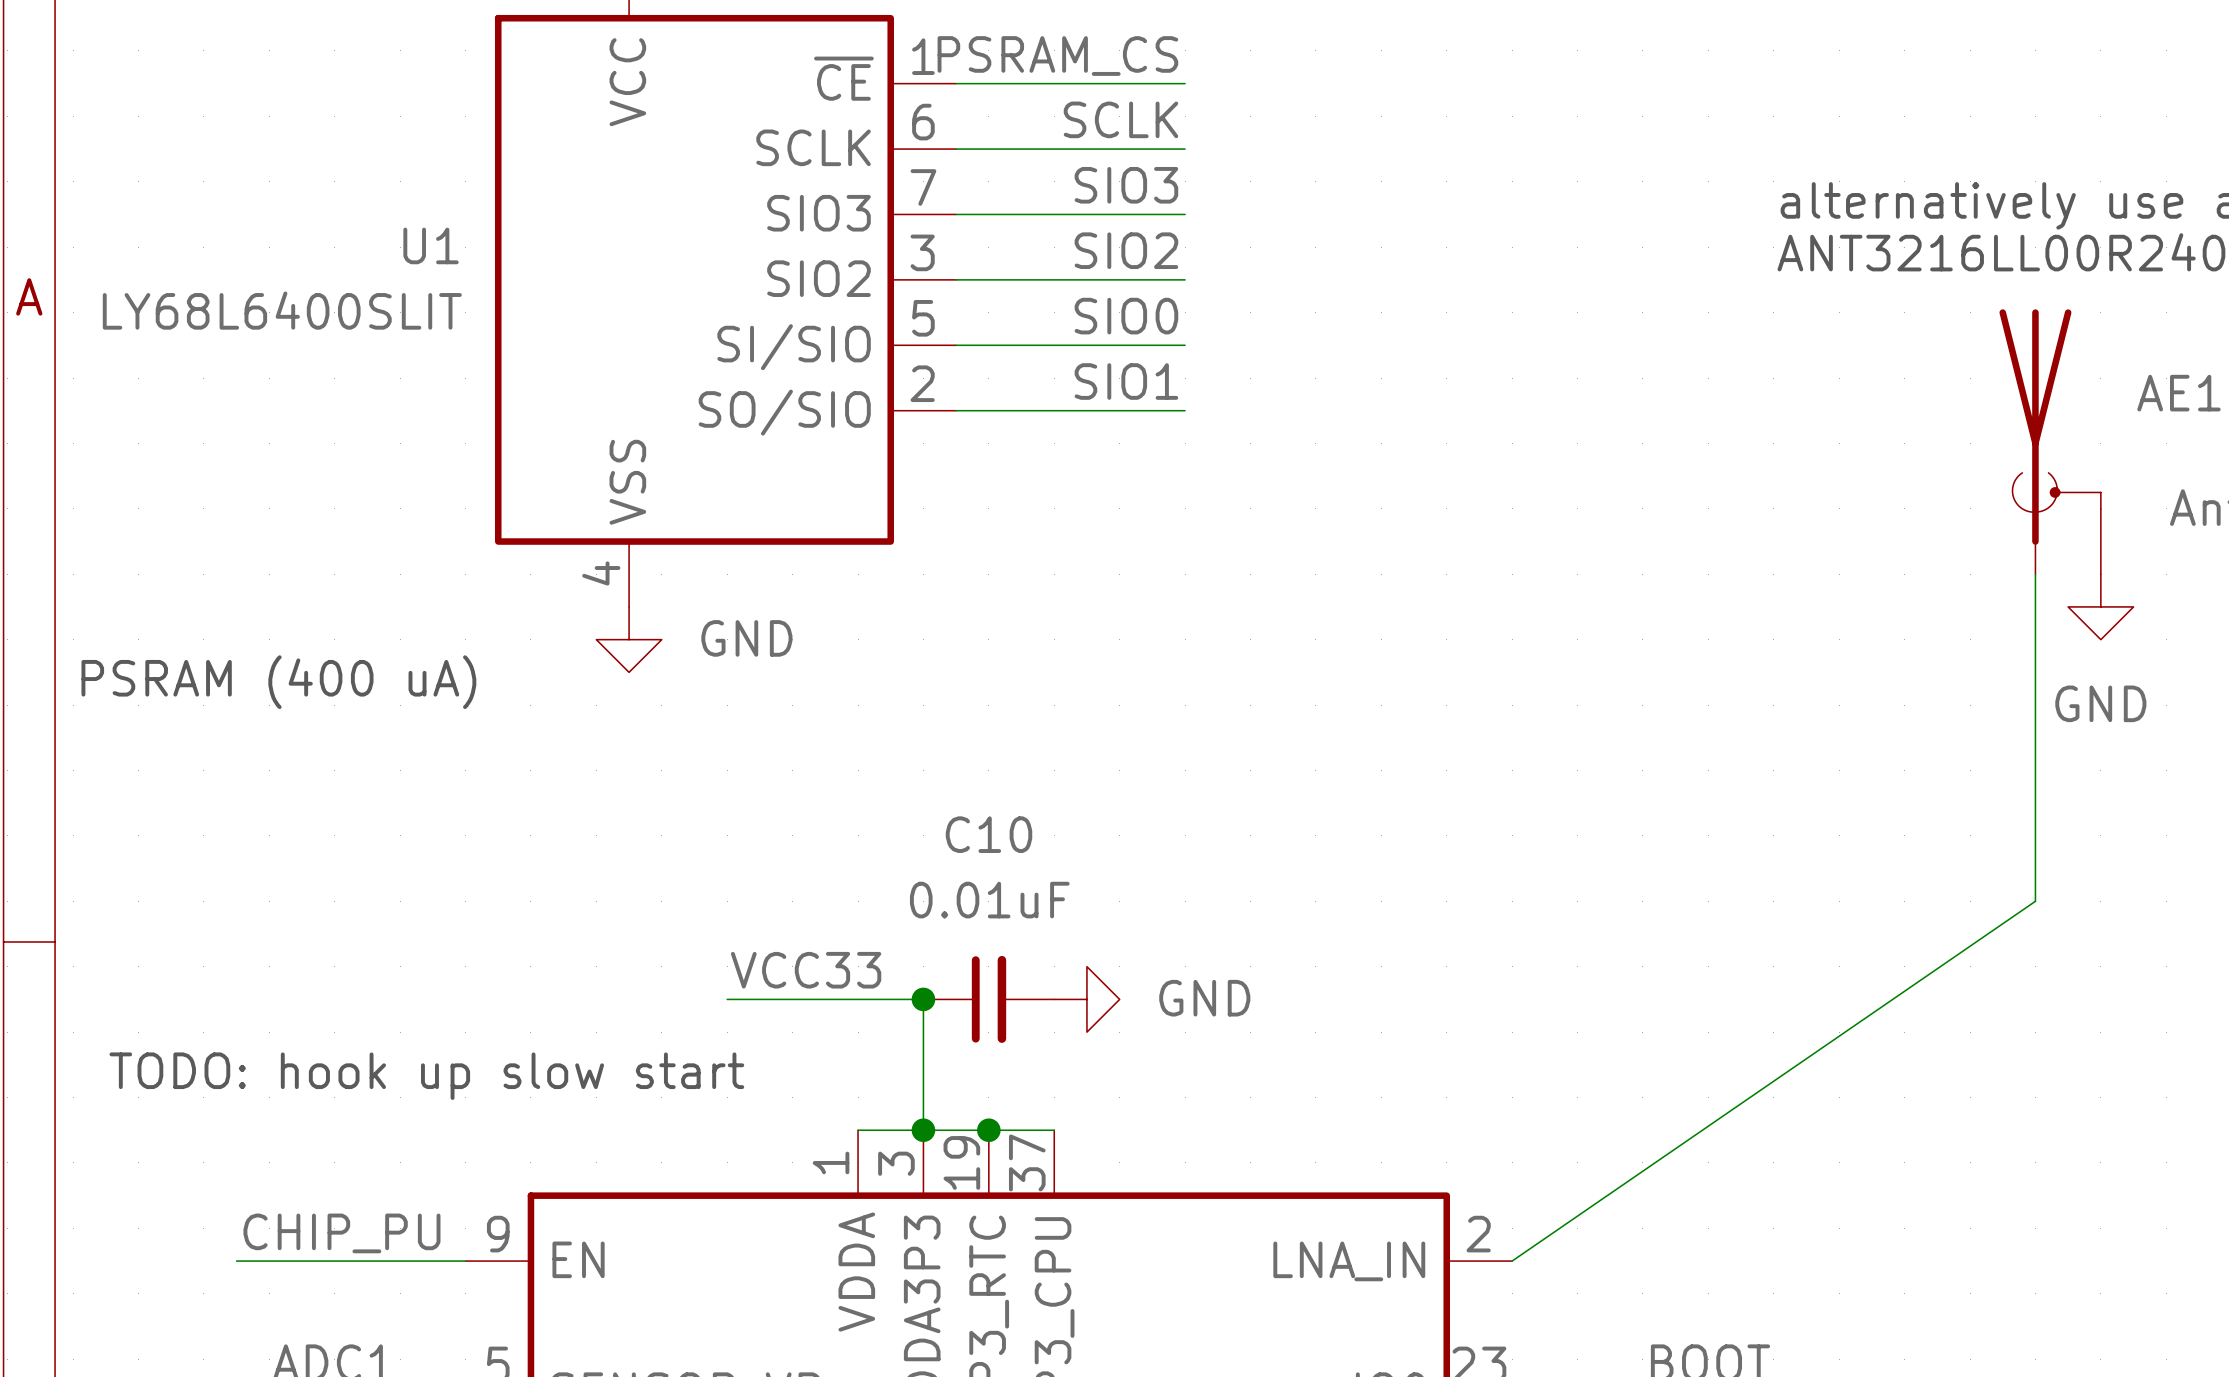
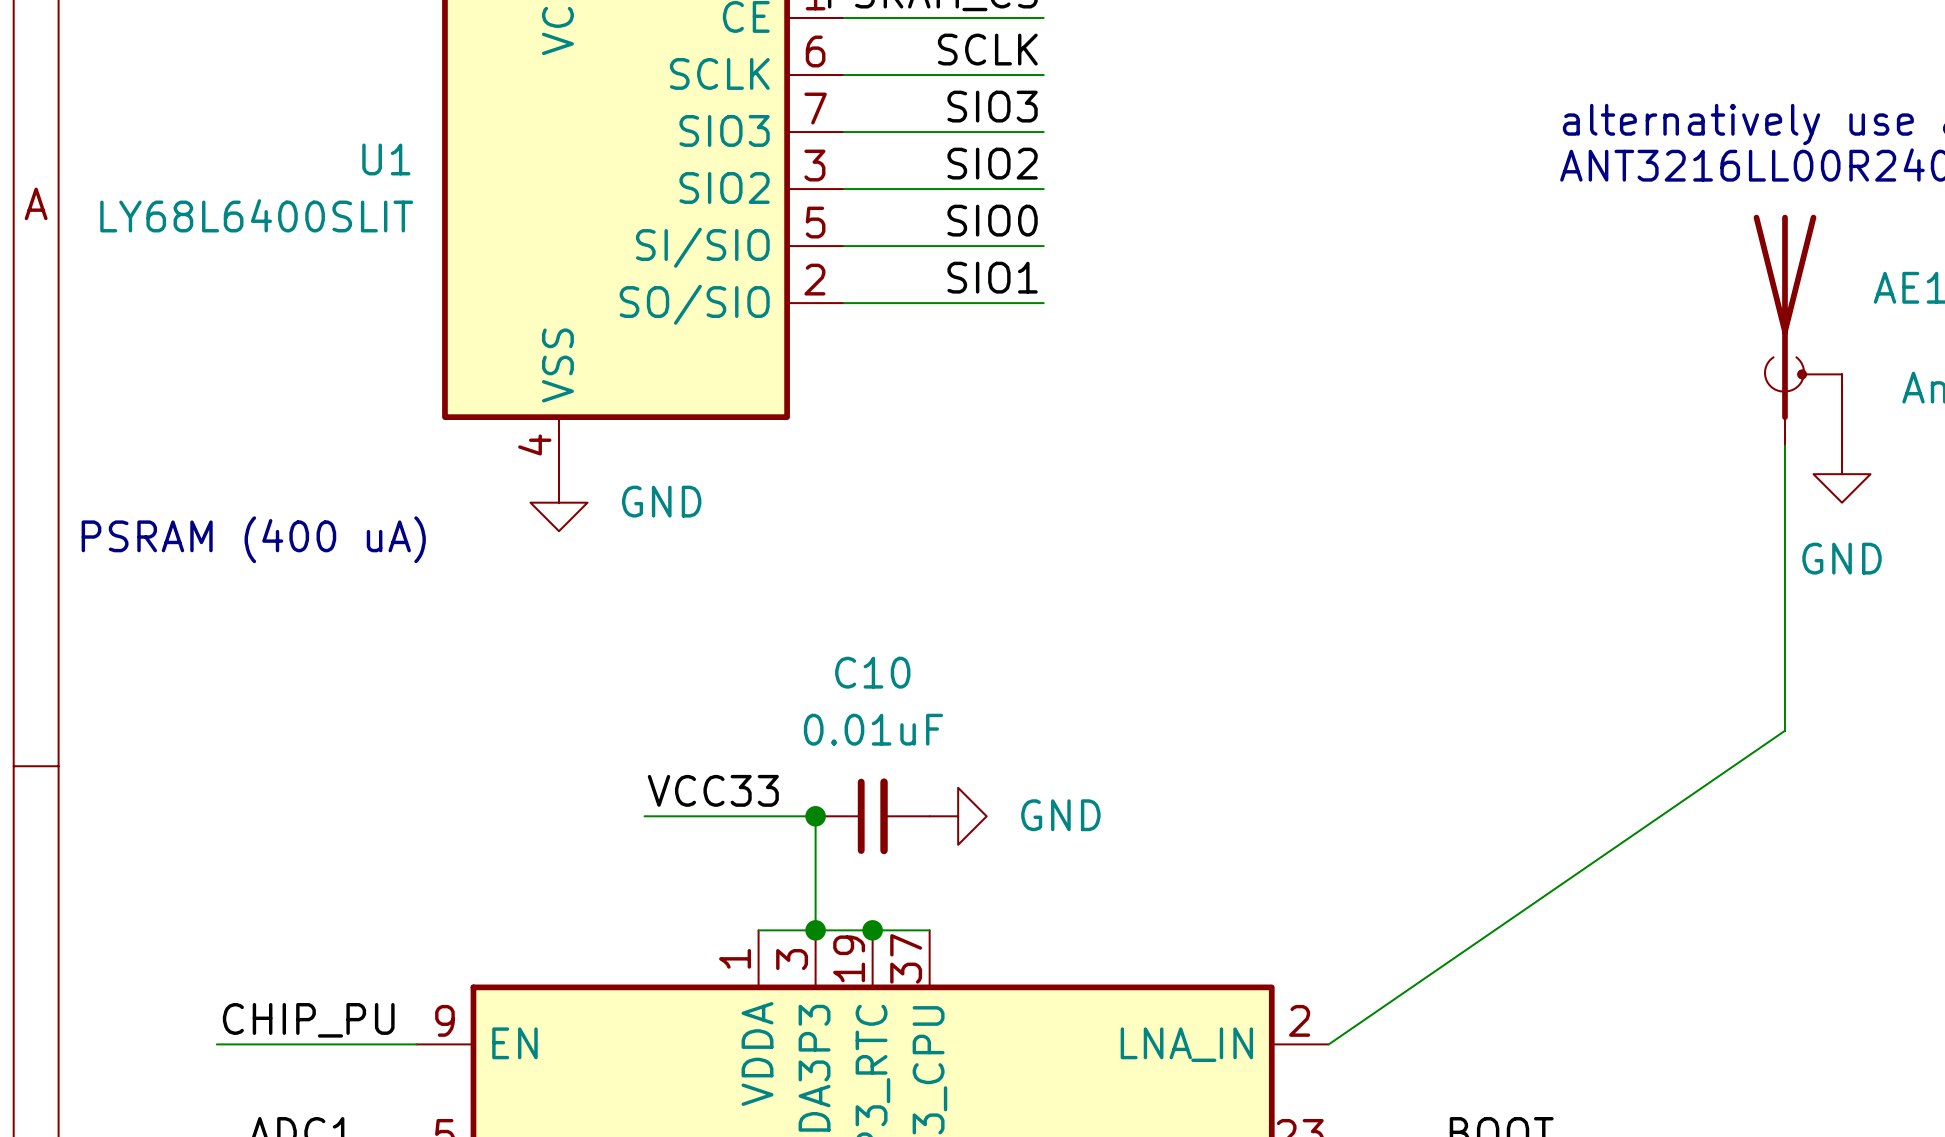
text: TODO: hook up slow start (426, 1076) -> none

